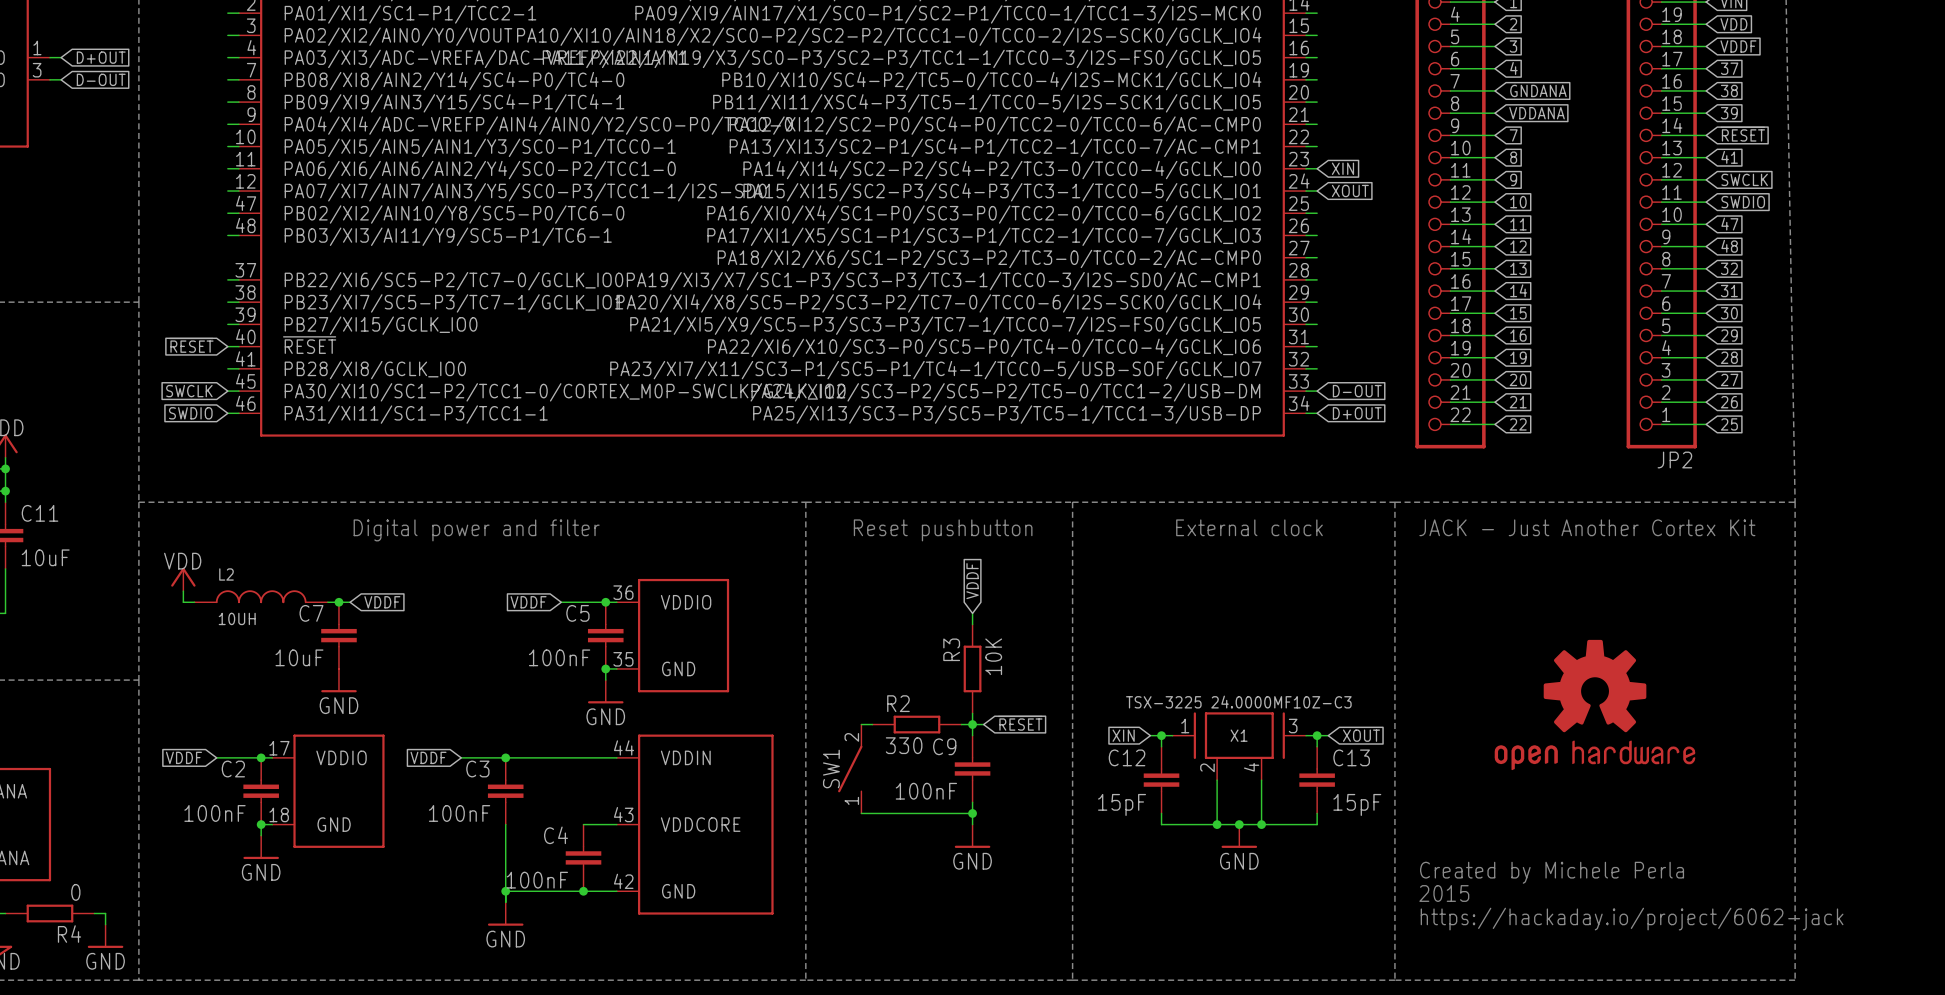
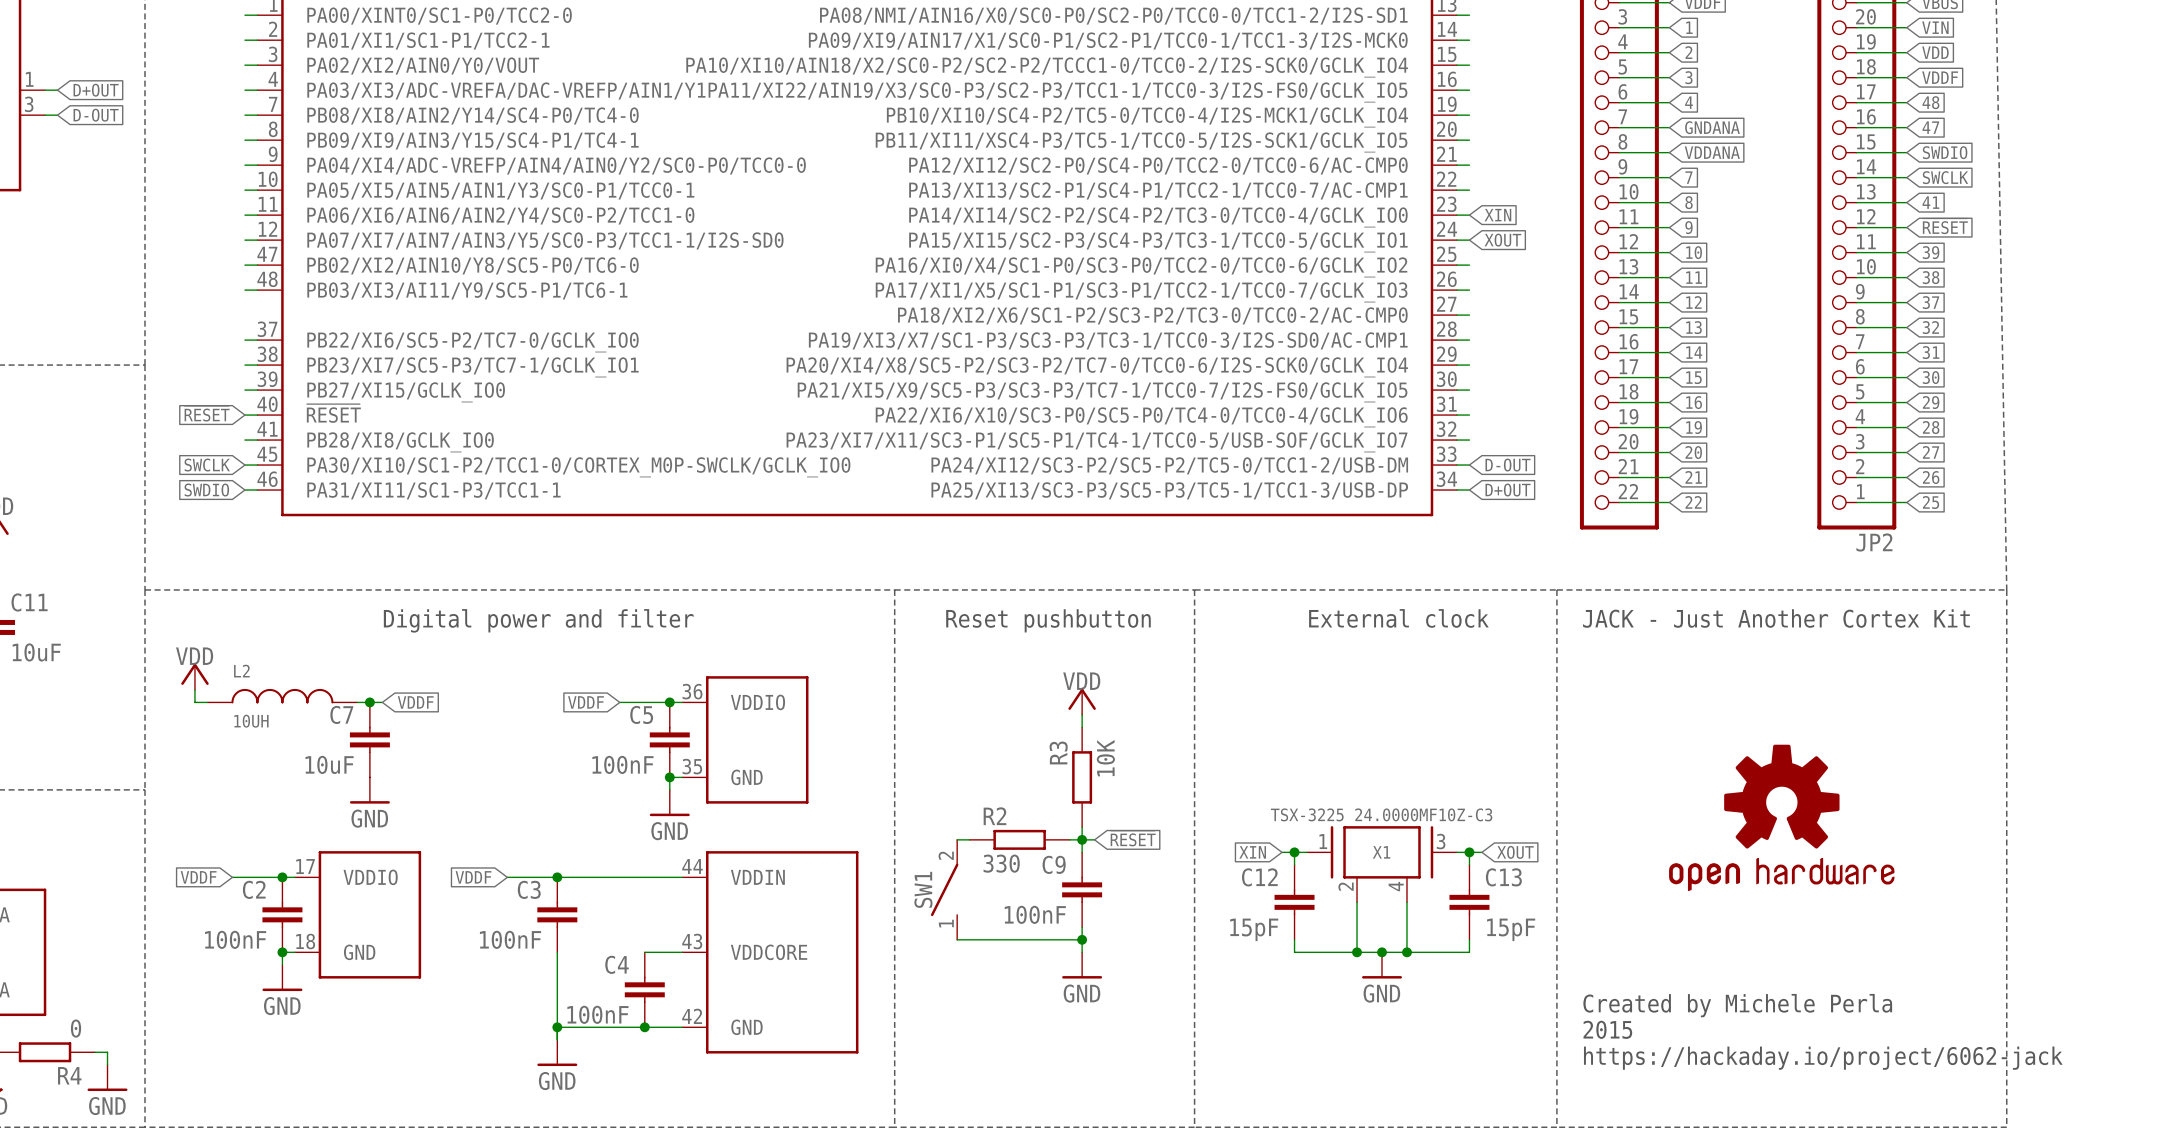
global label: 37 (1729, 68) -> 48 (1930, 102)
global label: 38 (1729, 90) -> 47 (1930, 127)
global label: 39 (1729, 113) -> SWDIO (1945, 152)
global label: ~{RESET} (1742, 134) -> SWCLK (1945, 177)
global label: SWCLK (1744, 179) -> ~{RESET} (1945, 226)
global label: SWDIO (1743, 202) -> 39 (1931, 252)
global label: 47 (1729, 224) -> 38 (1931, 277)
global label: 48 (1729, 246) -> 37 (1931, 302)
global label: VDDF (972, 581) -> none
power symbol: none -> VDD (1082, 701)

